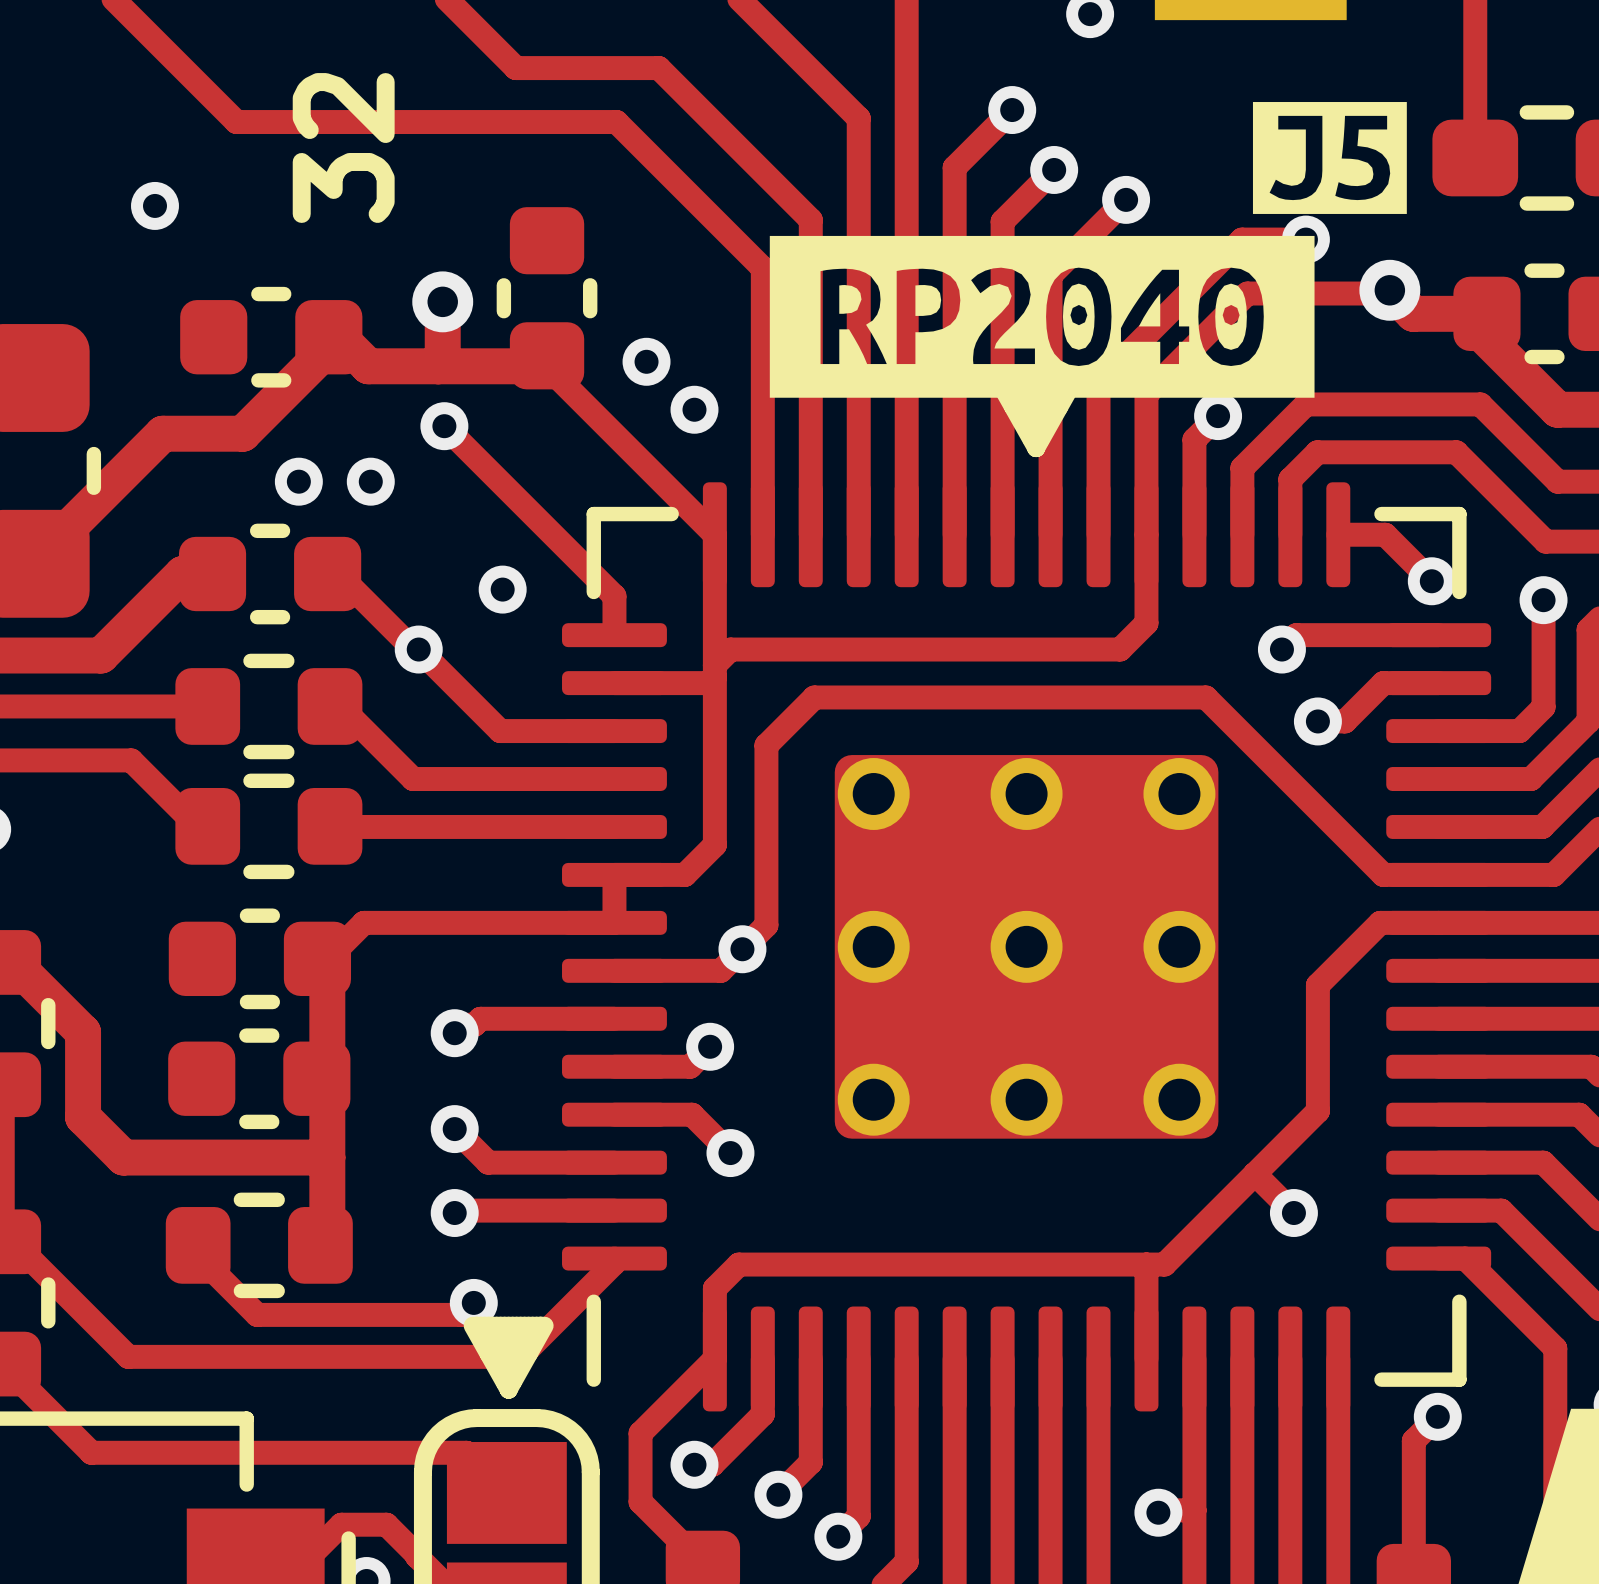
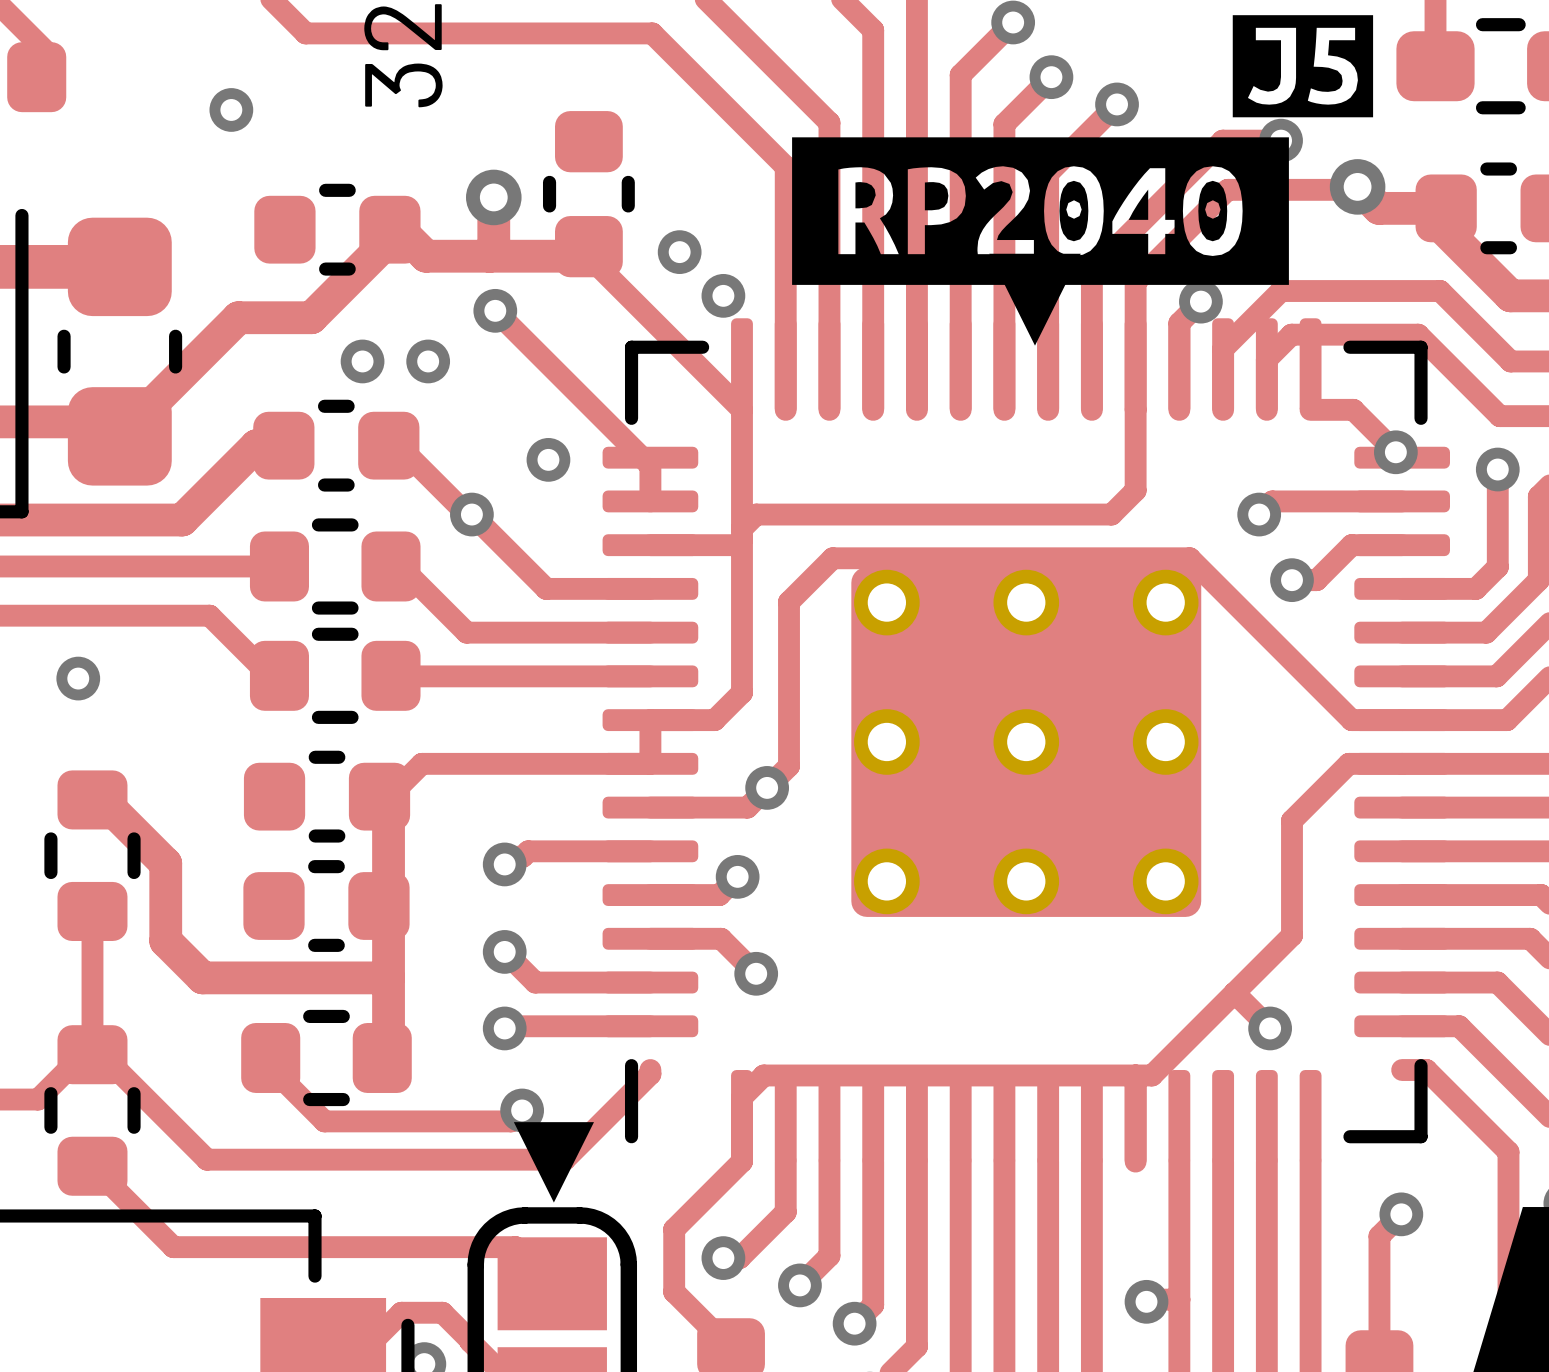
part position: (1026, 946) -> (1026, 741)

